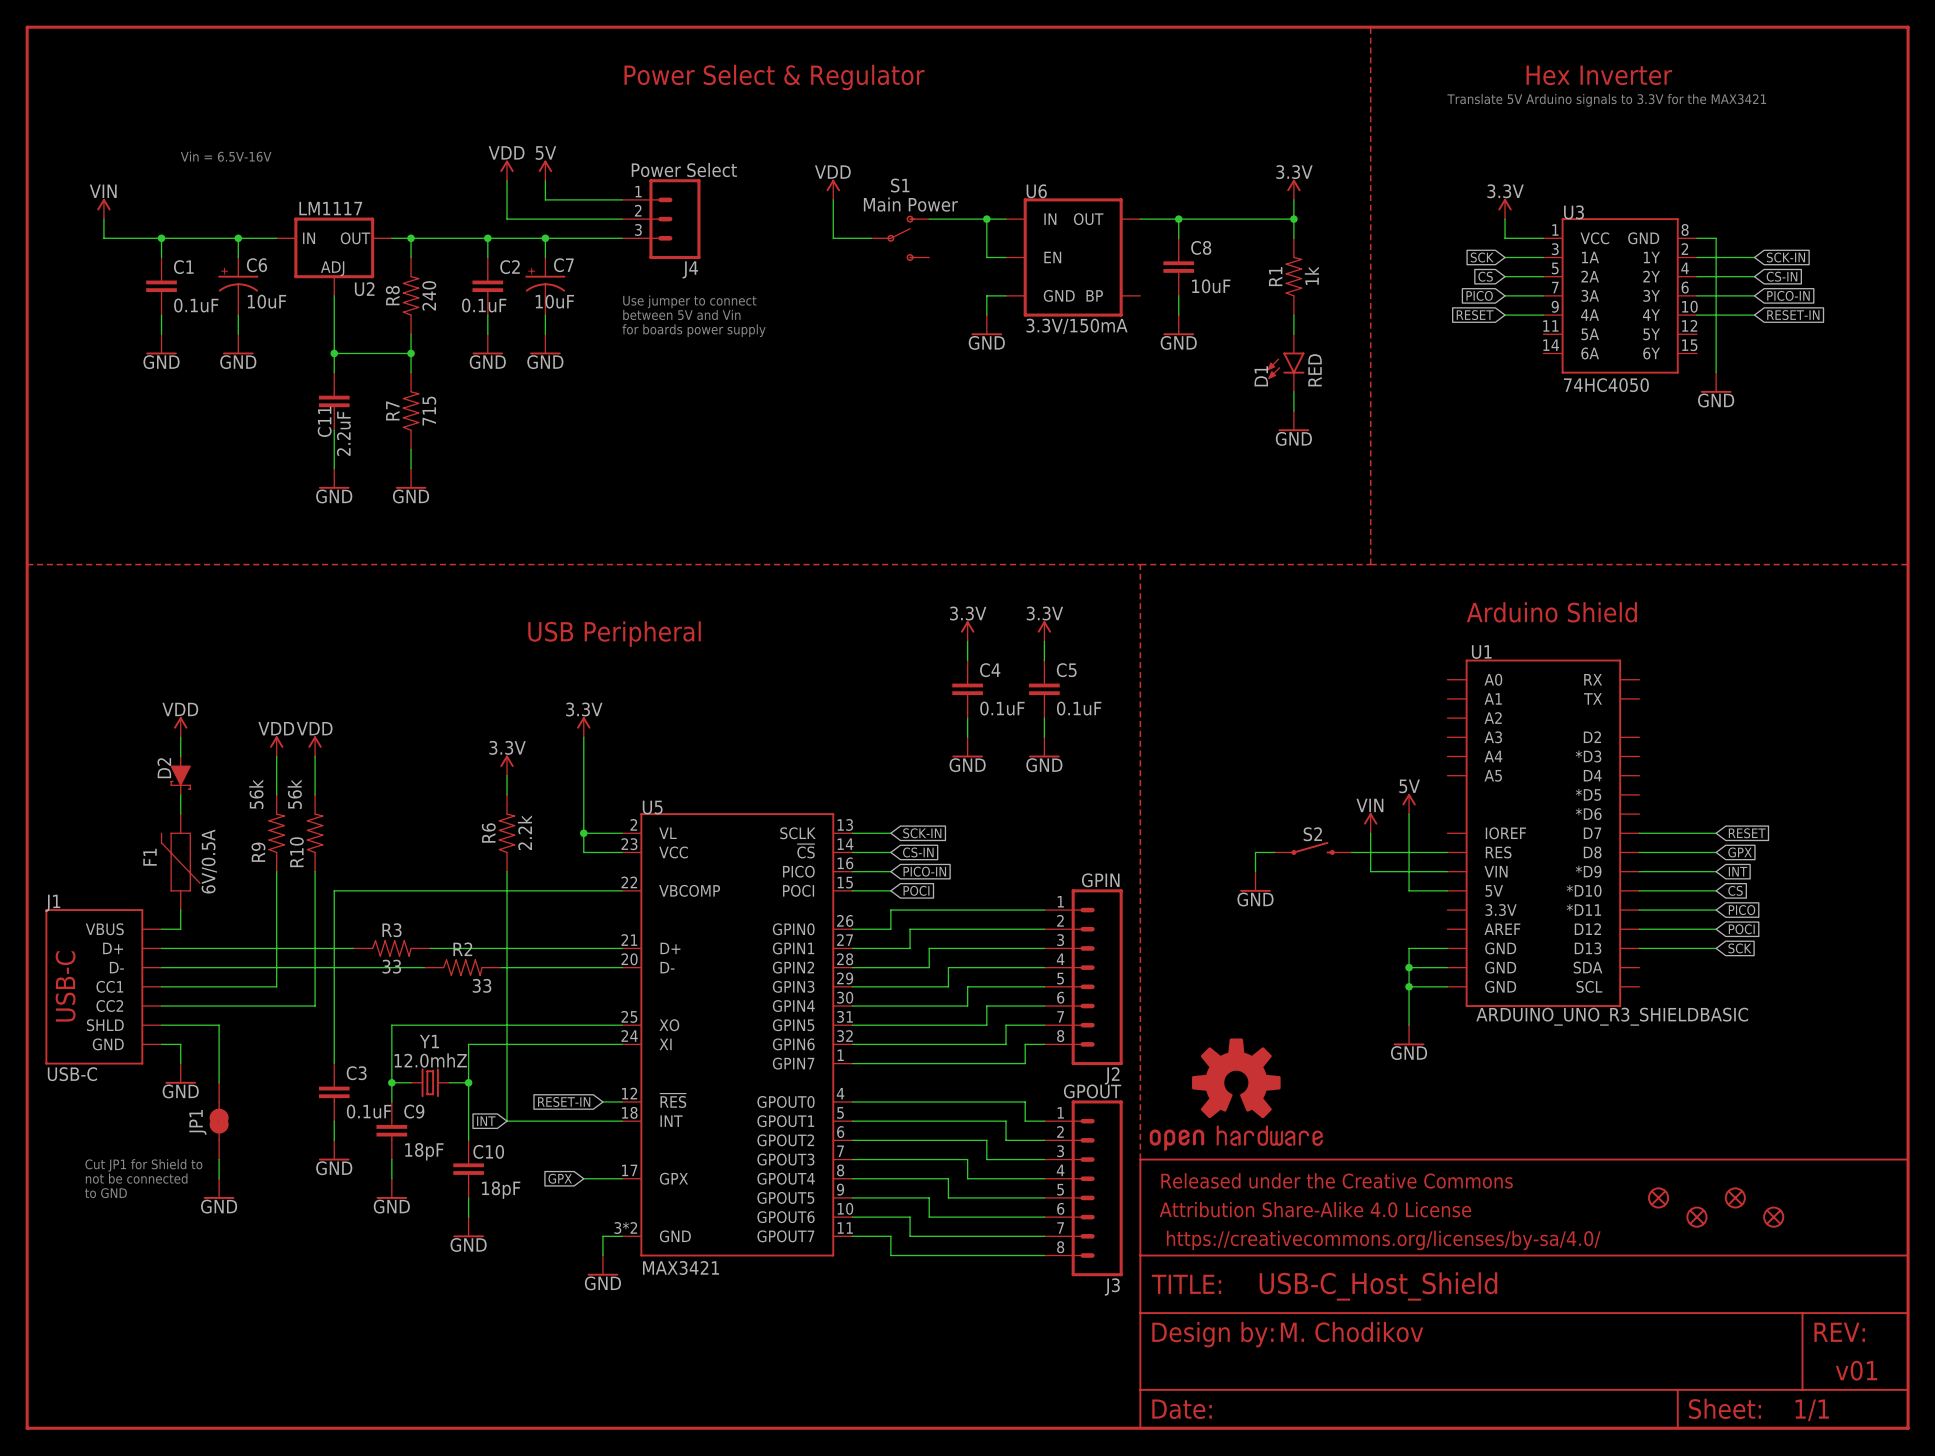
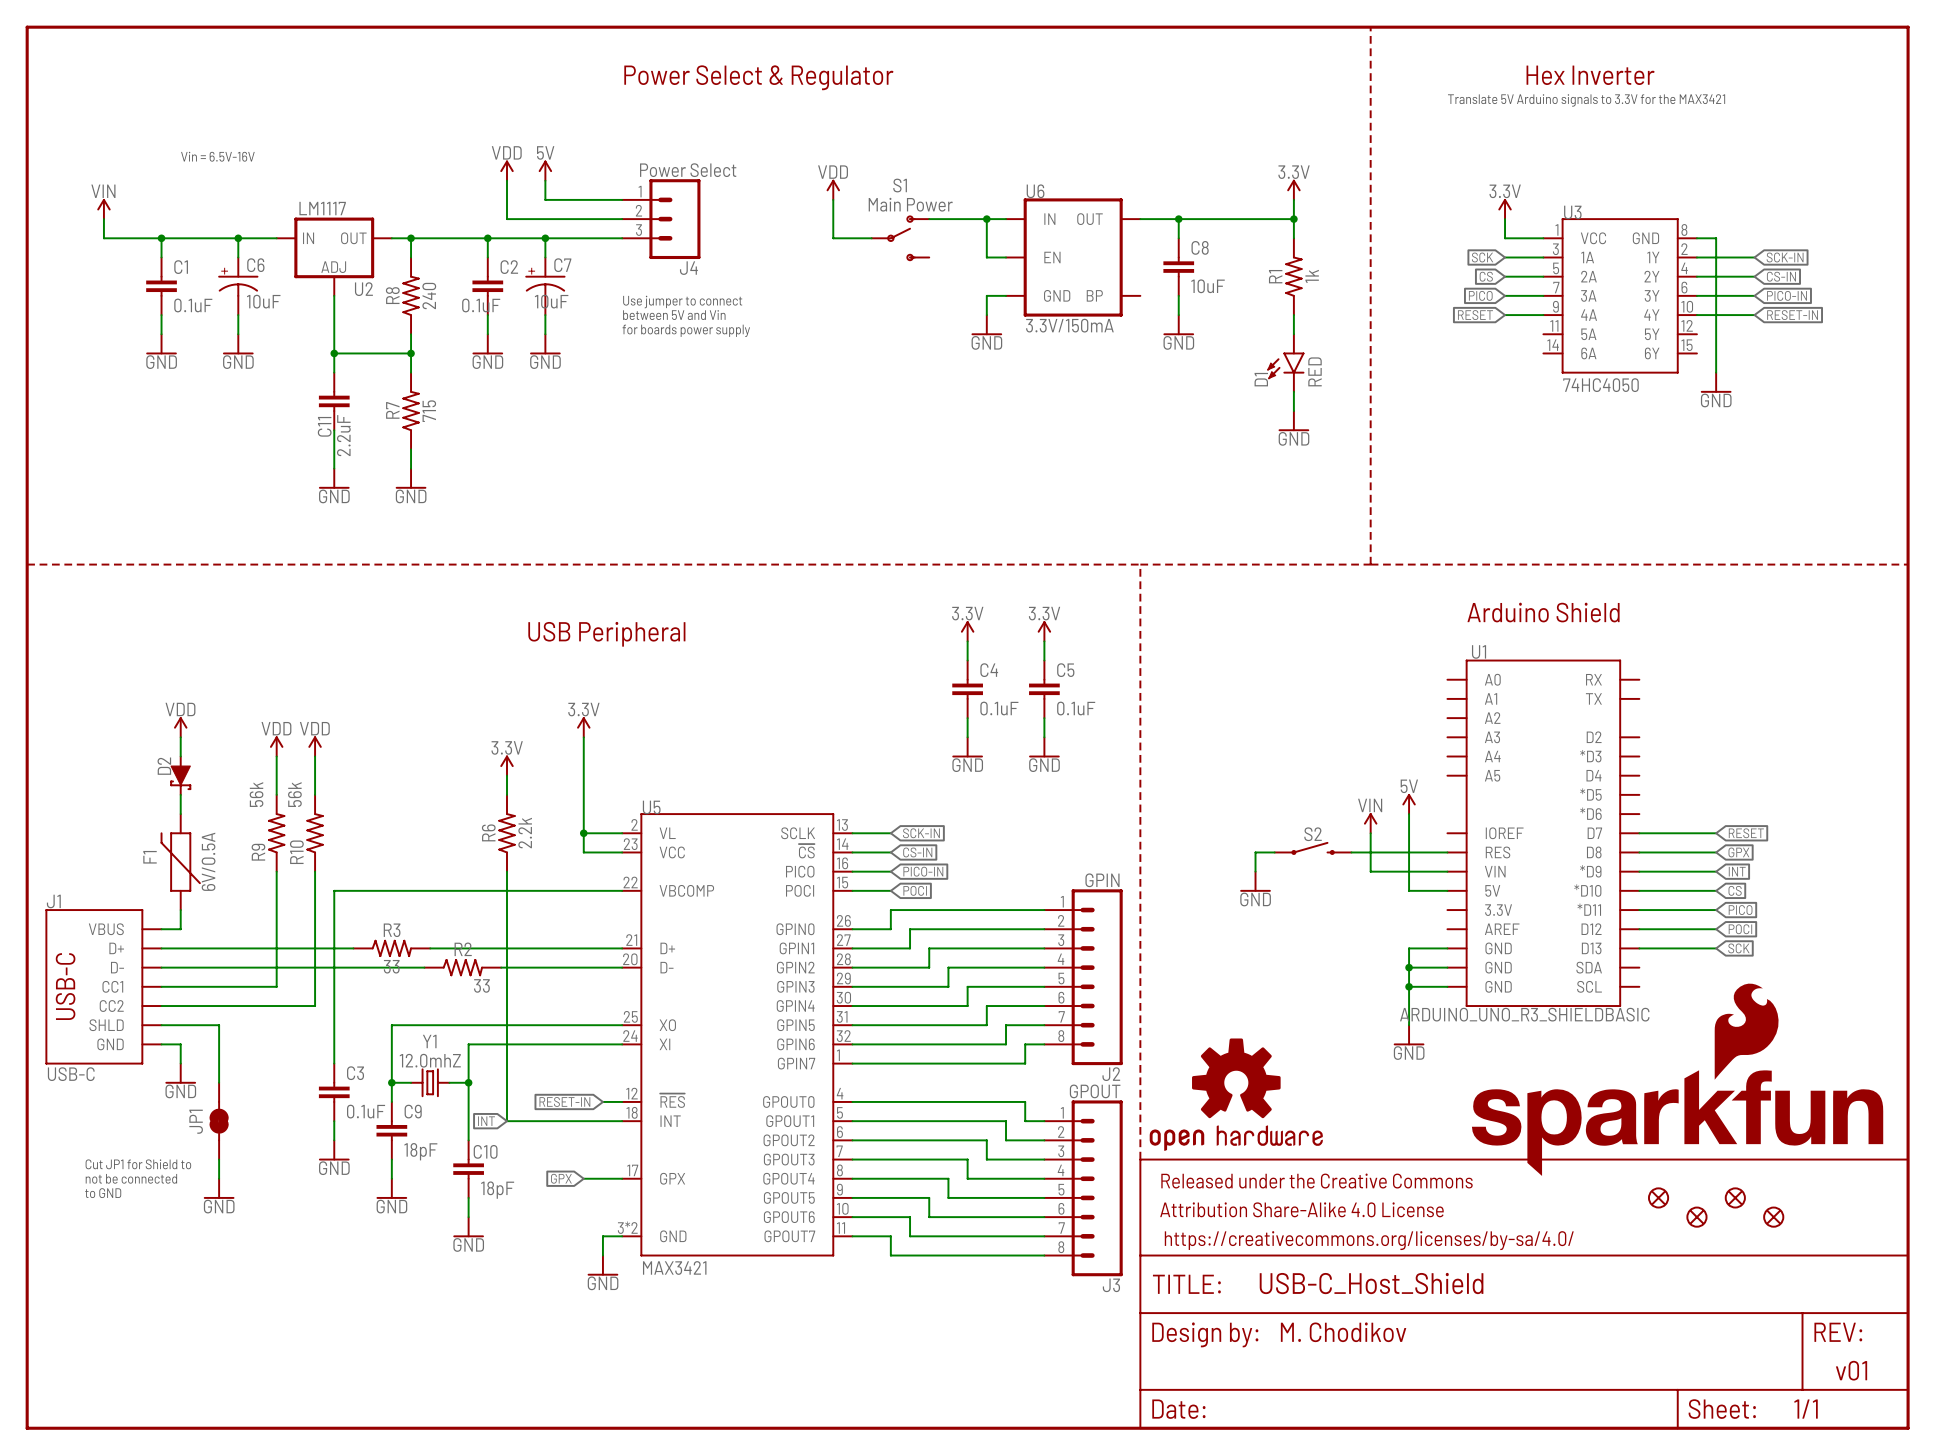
U1 value position: ARDUINO_UNO_R3_SHIELDBASIC (1612, 1016) -> ARDUINO_UNO_R3_SHIELDBASIC (1524, 1014)
part: none -> (1677, 1079)

